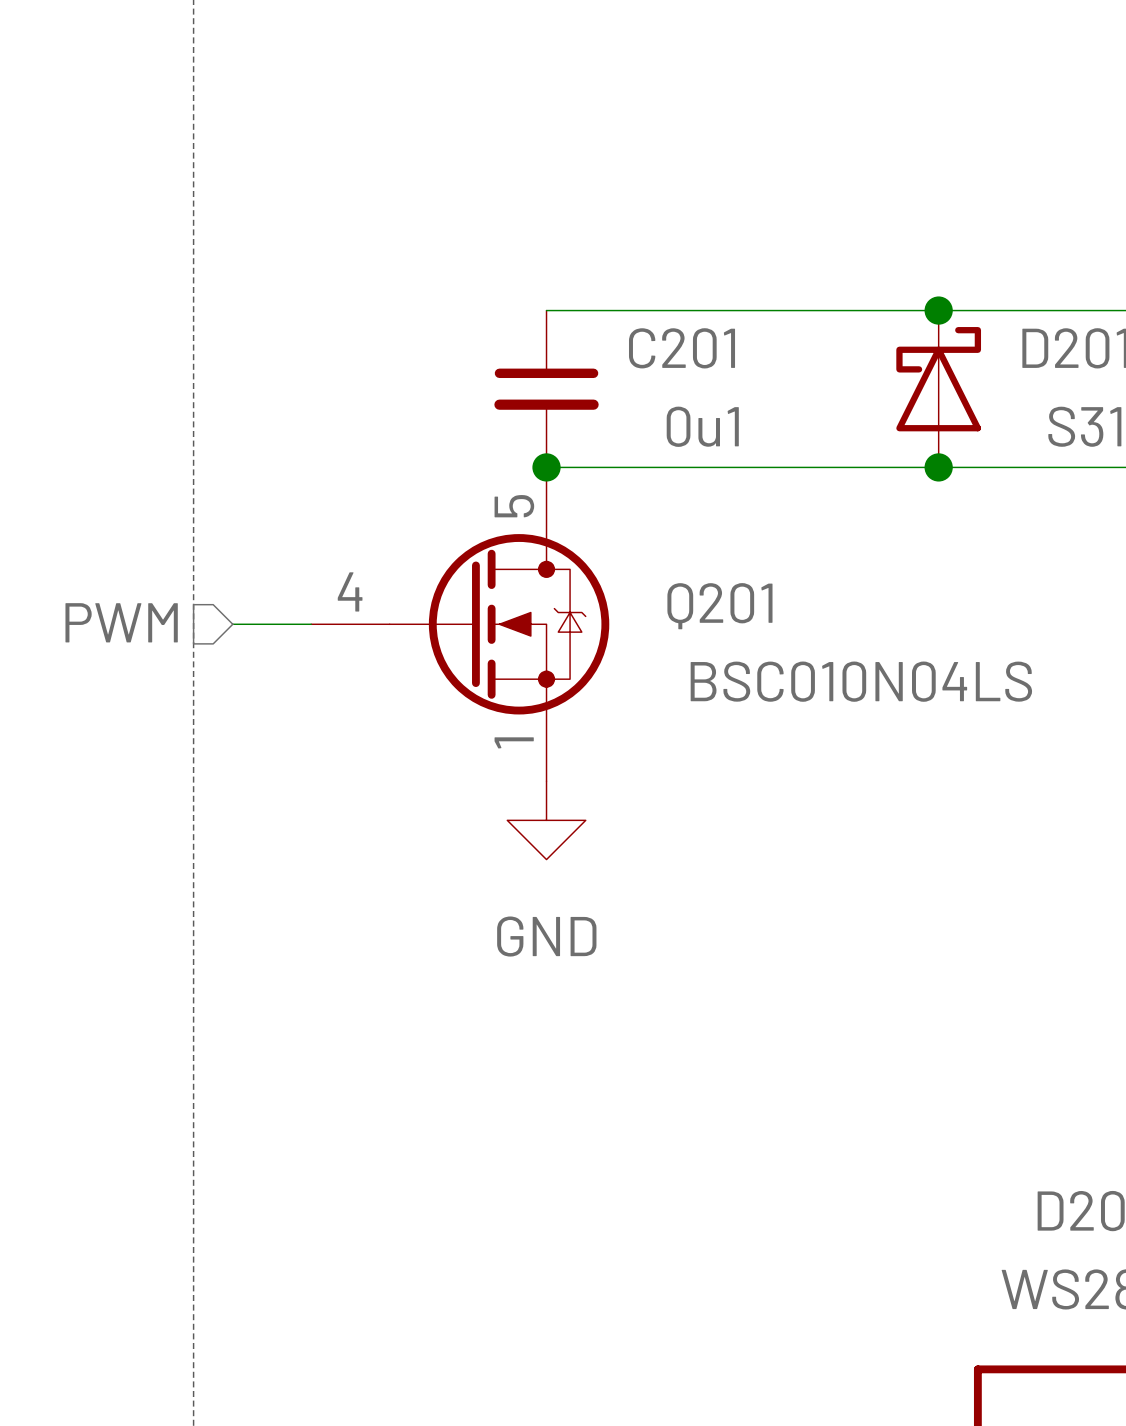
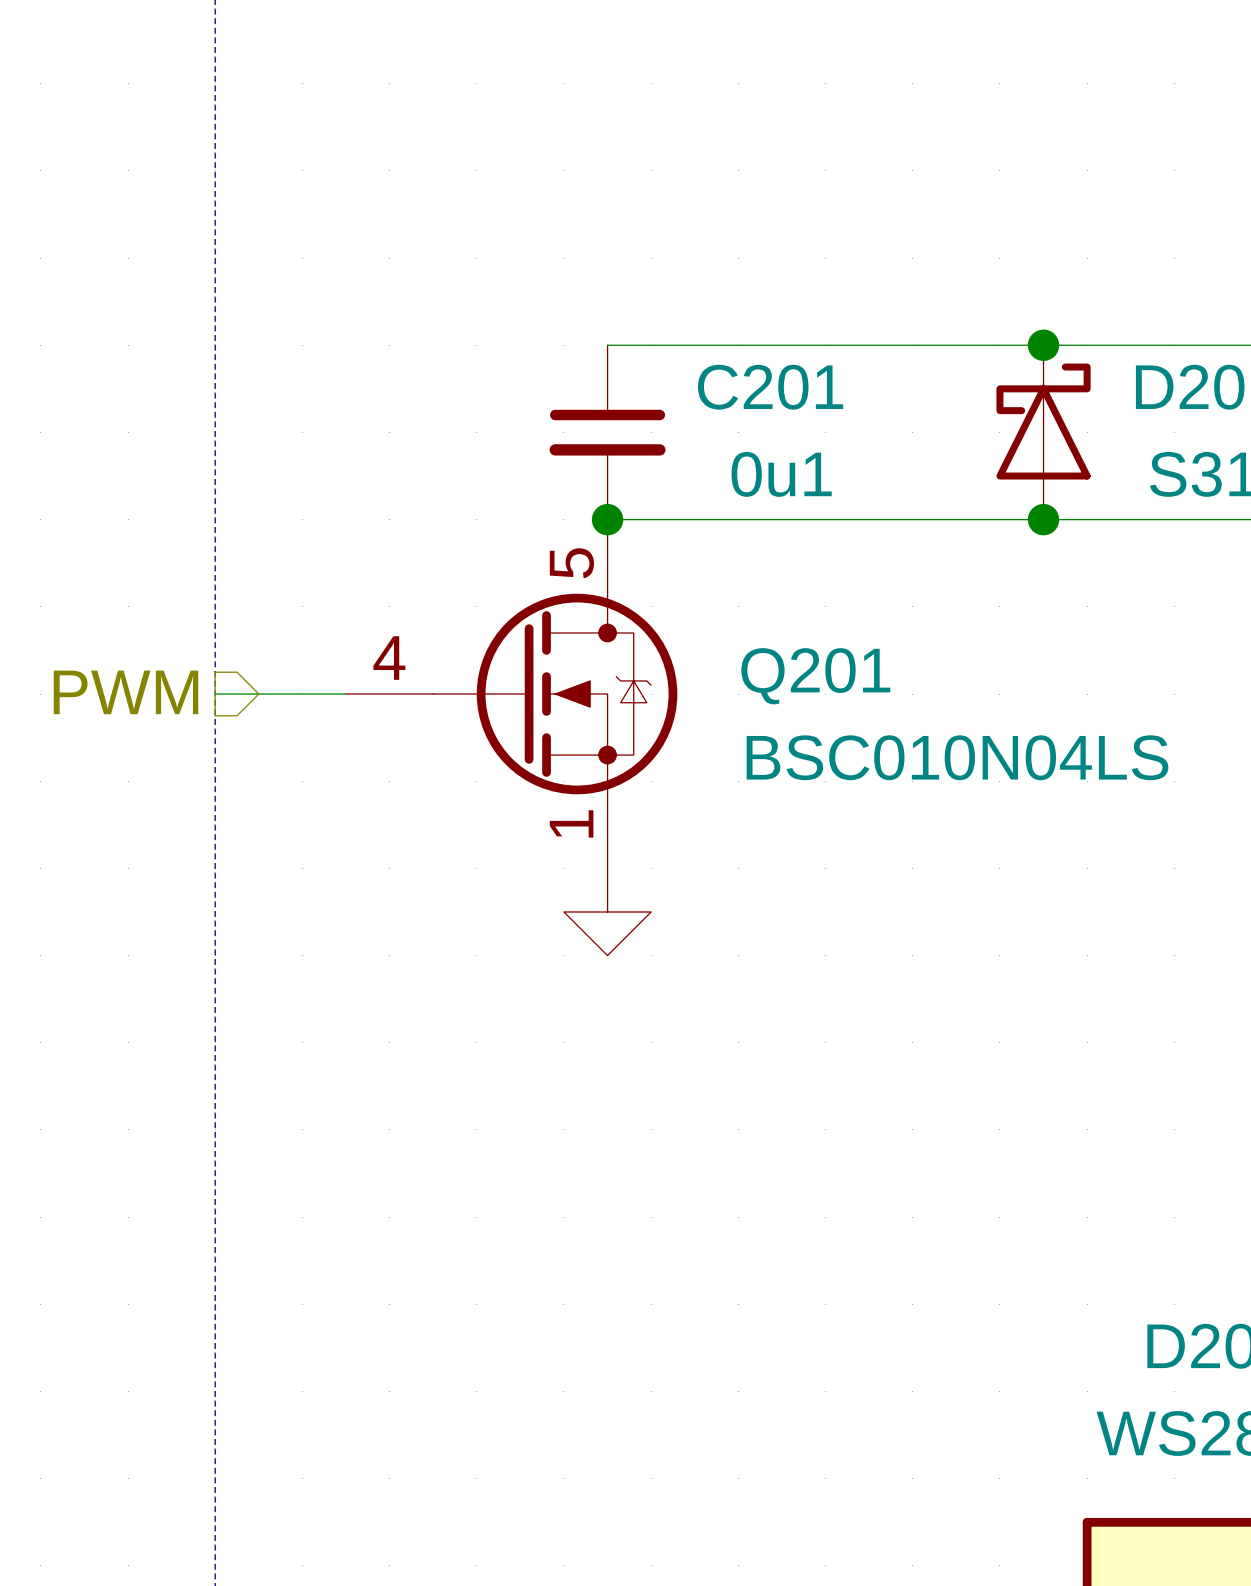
wire: none -> (215, 694) (258, 694)
power symbol text: GND (546, 936) -> none

